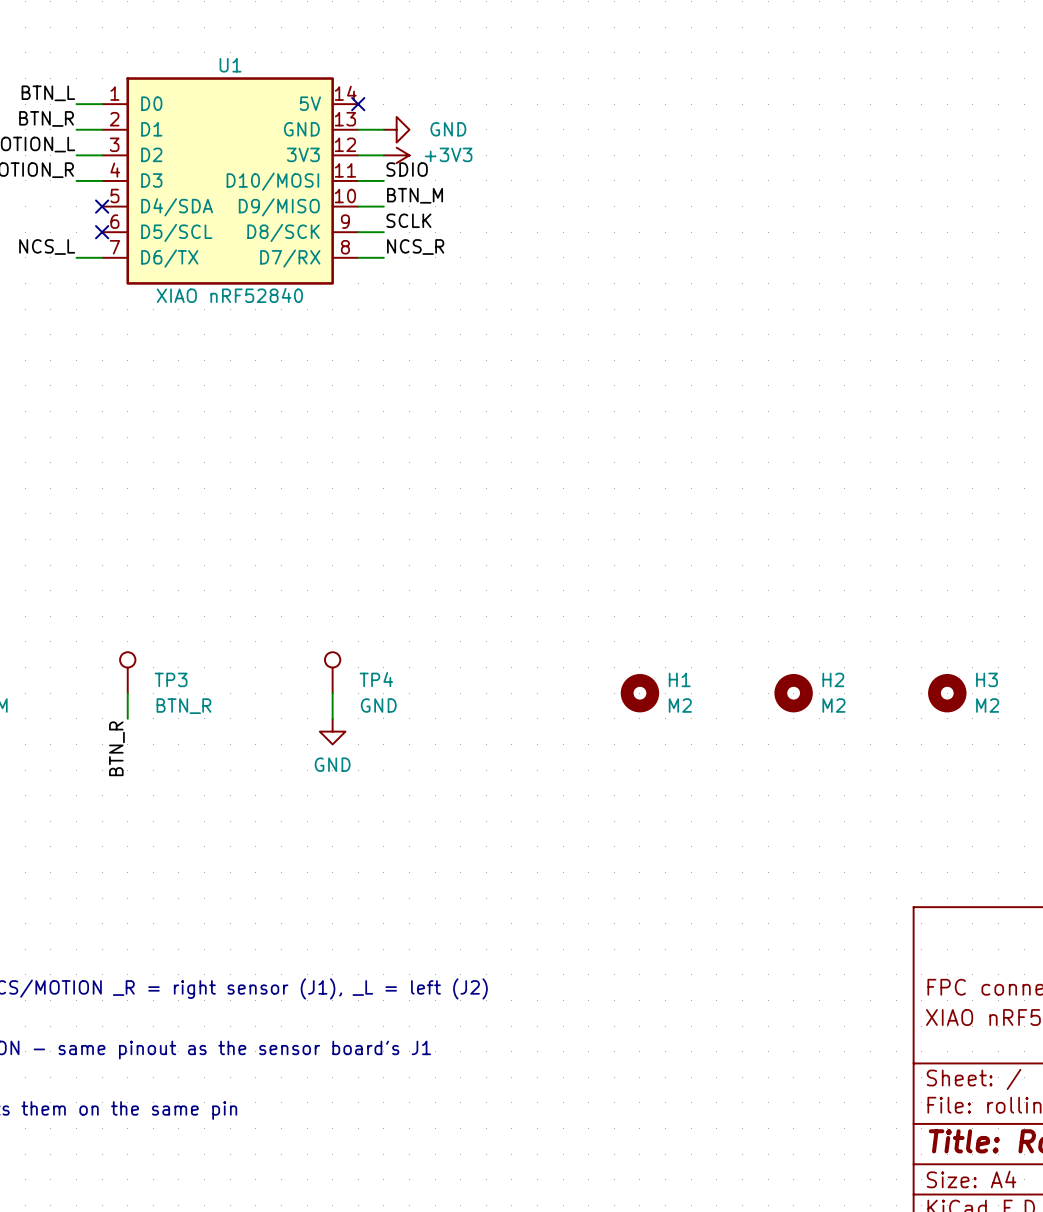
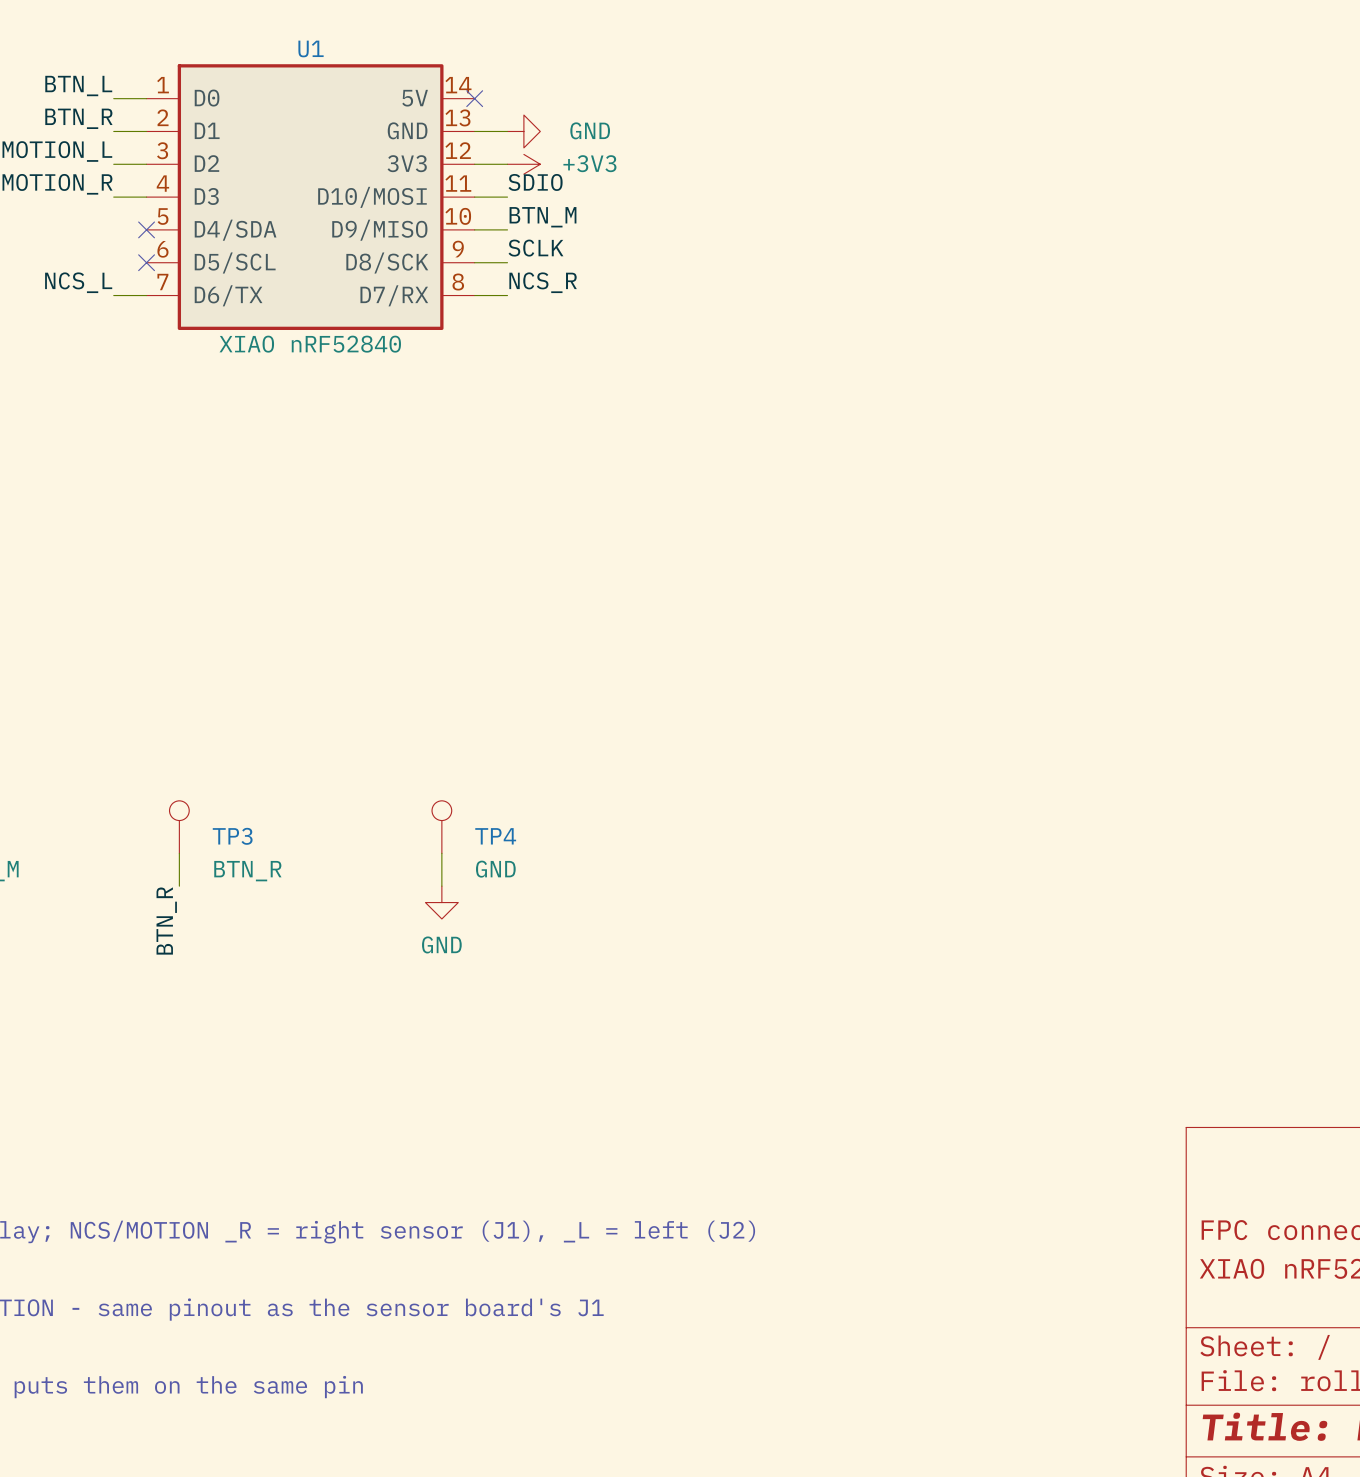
H1: M2 (639, 693) -> none
H2: M2 (793, 693) -> none
H3: M2 (947, 693) -> none

